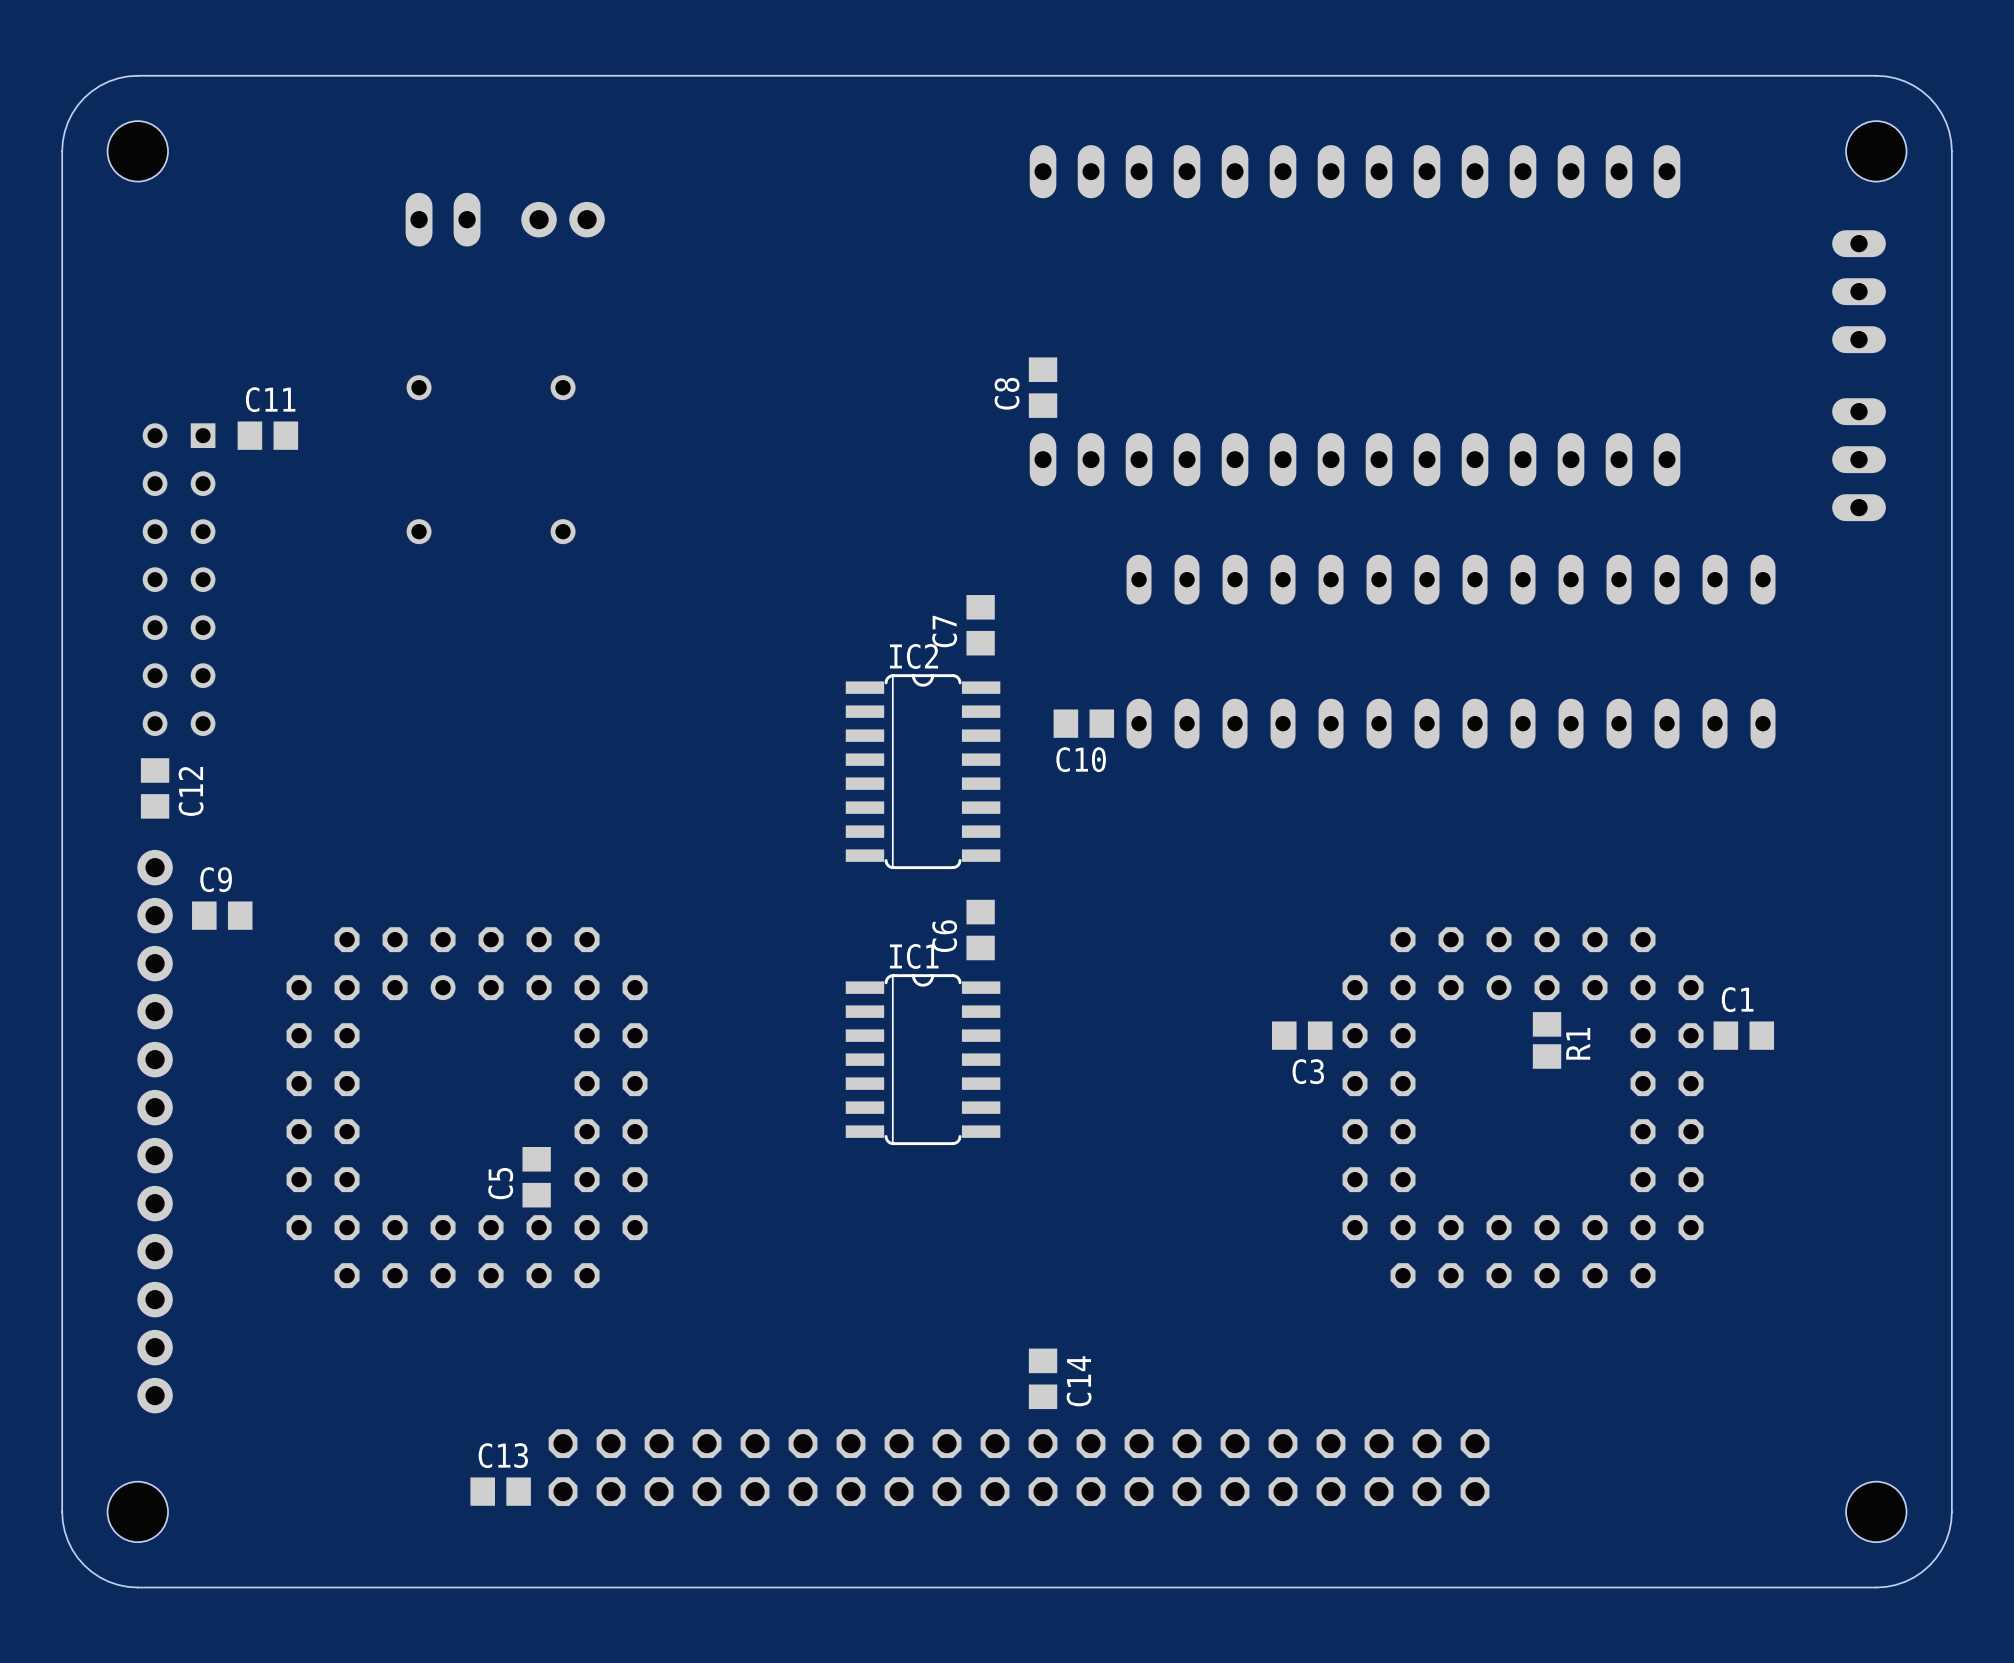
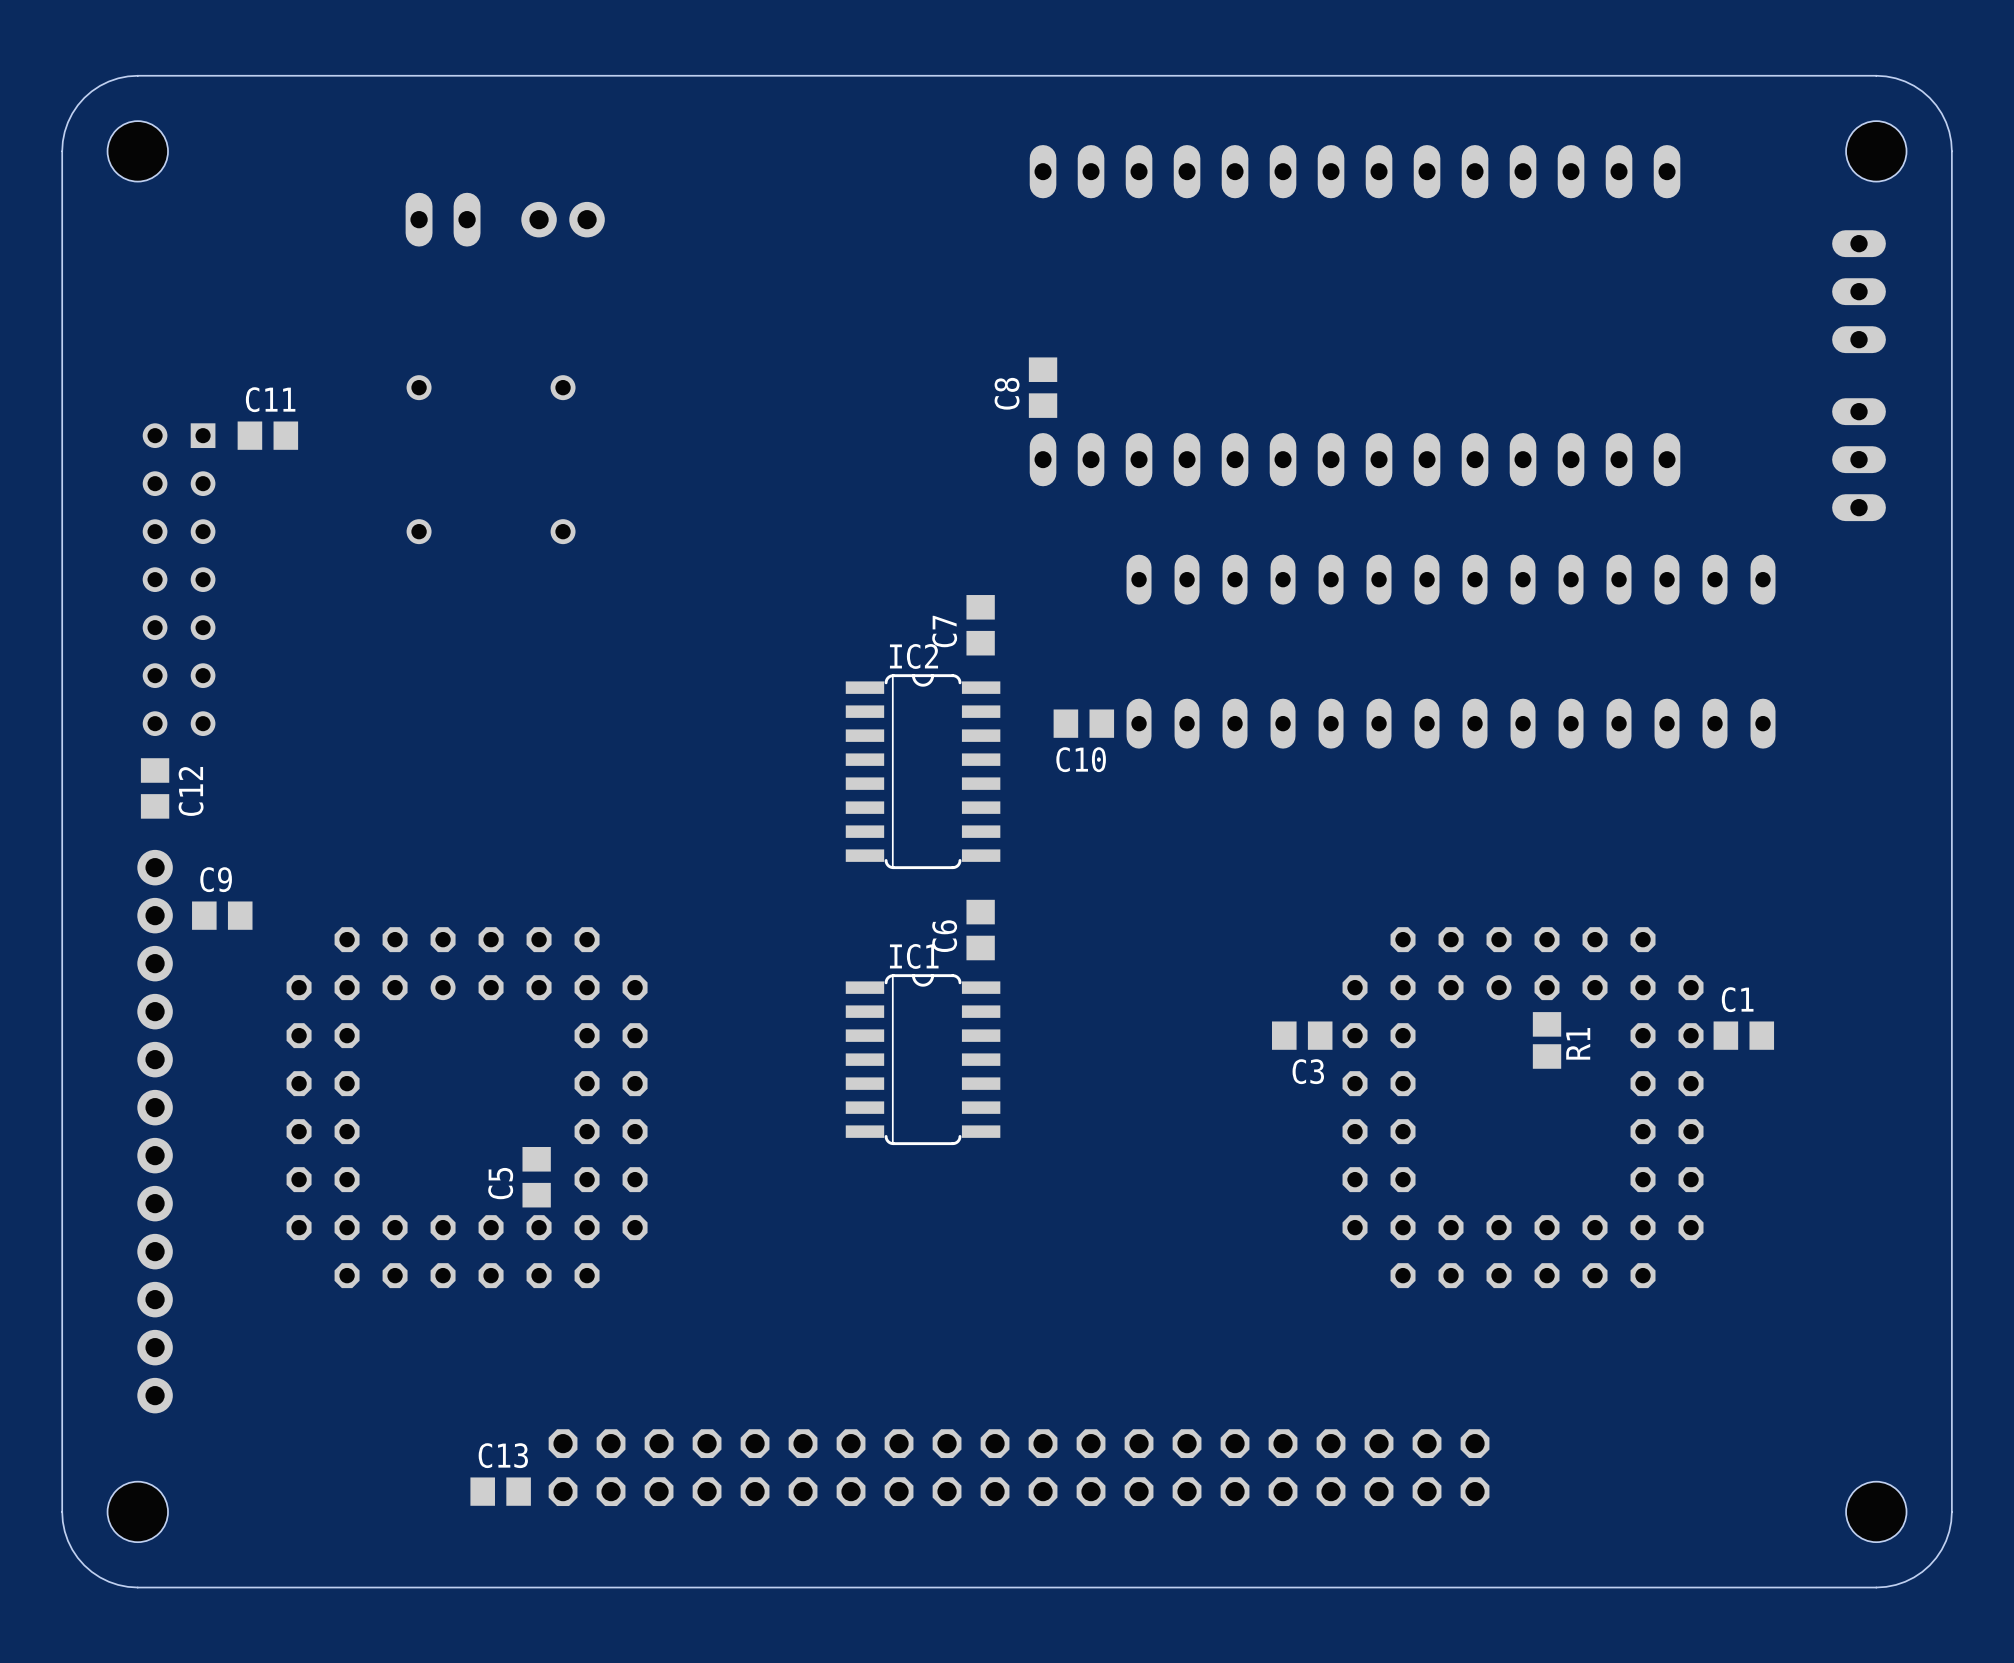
C14: (1043, 1378) -> none

